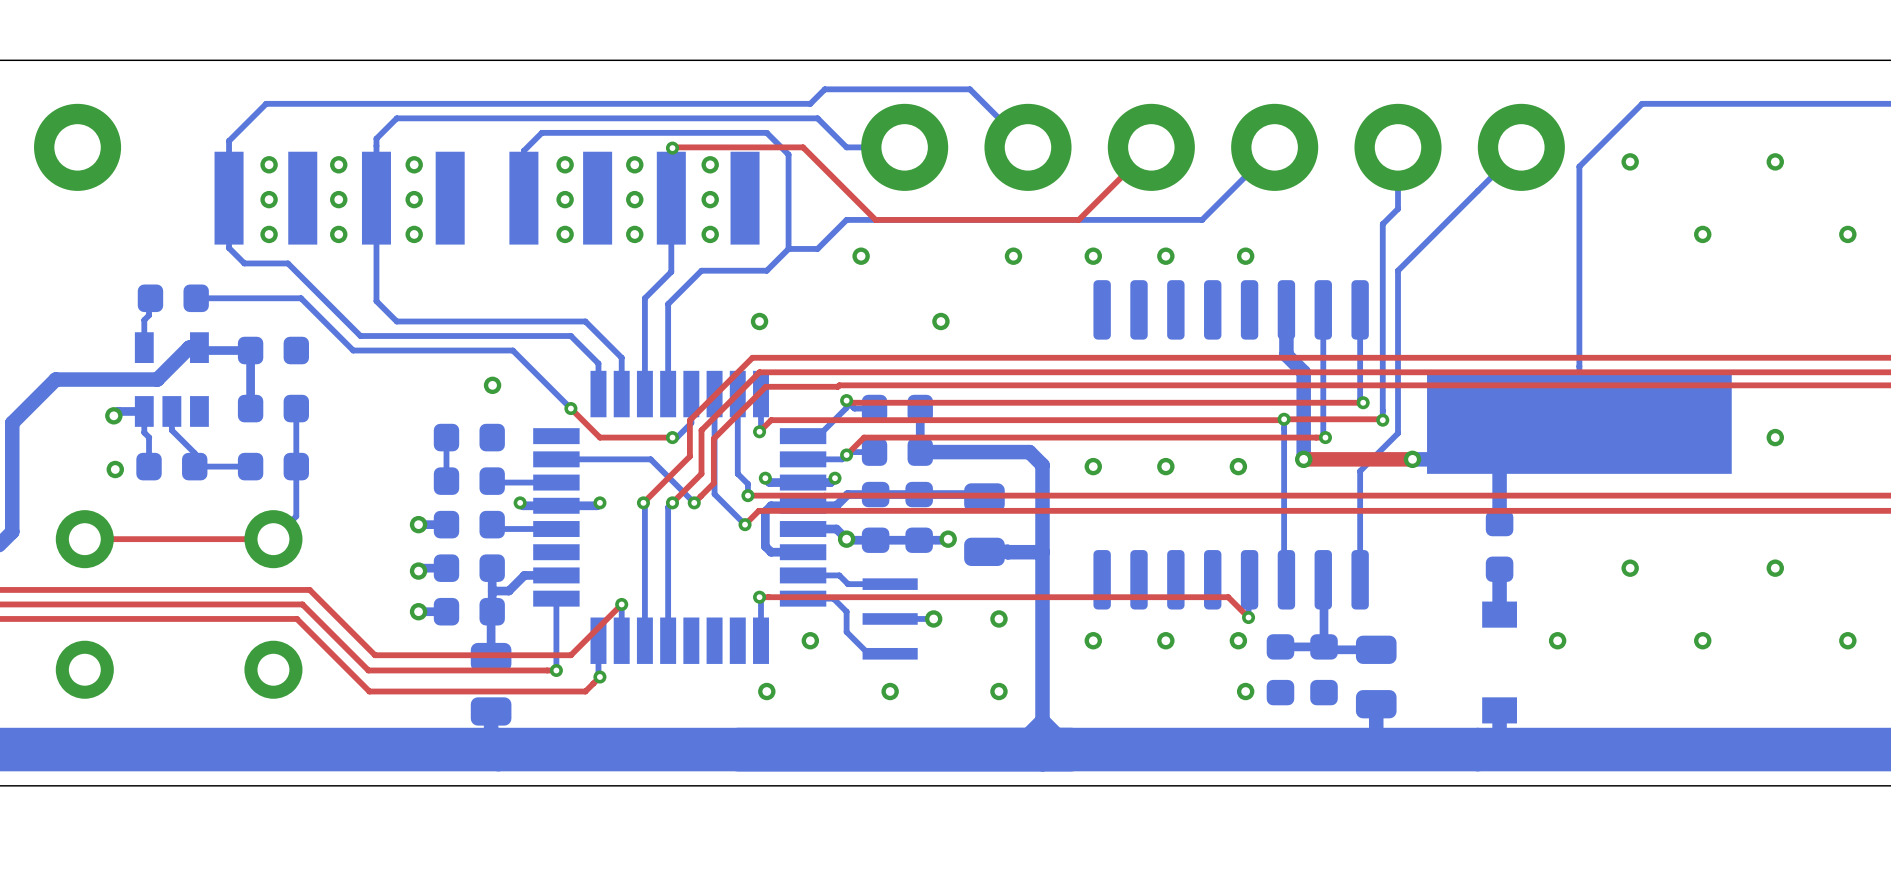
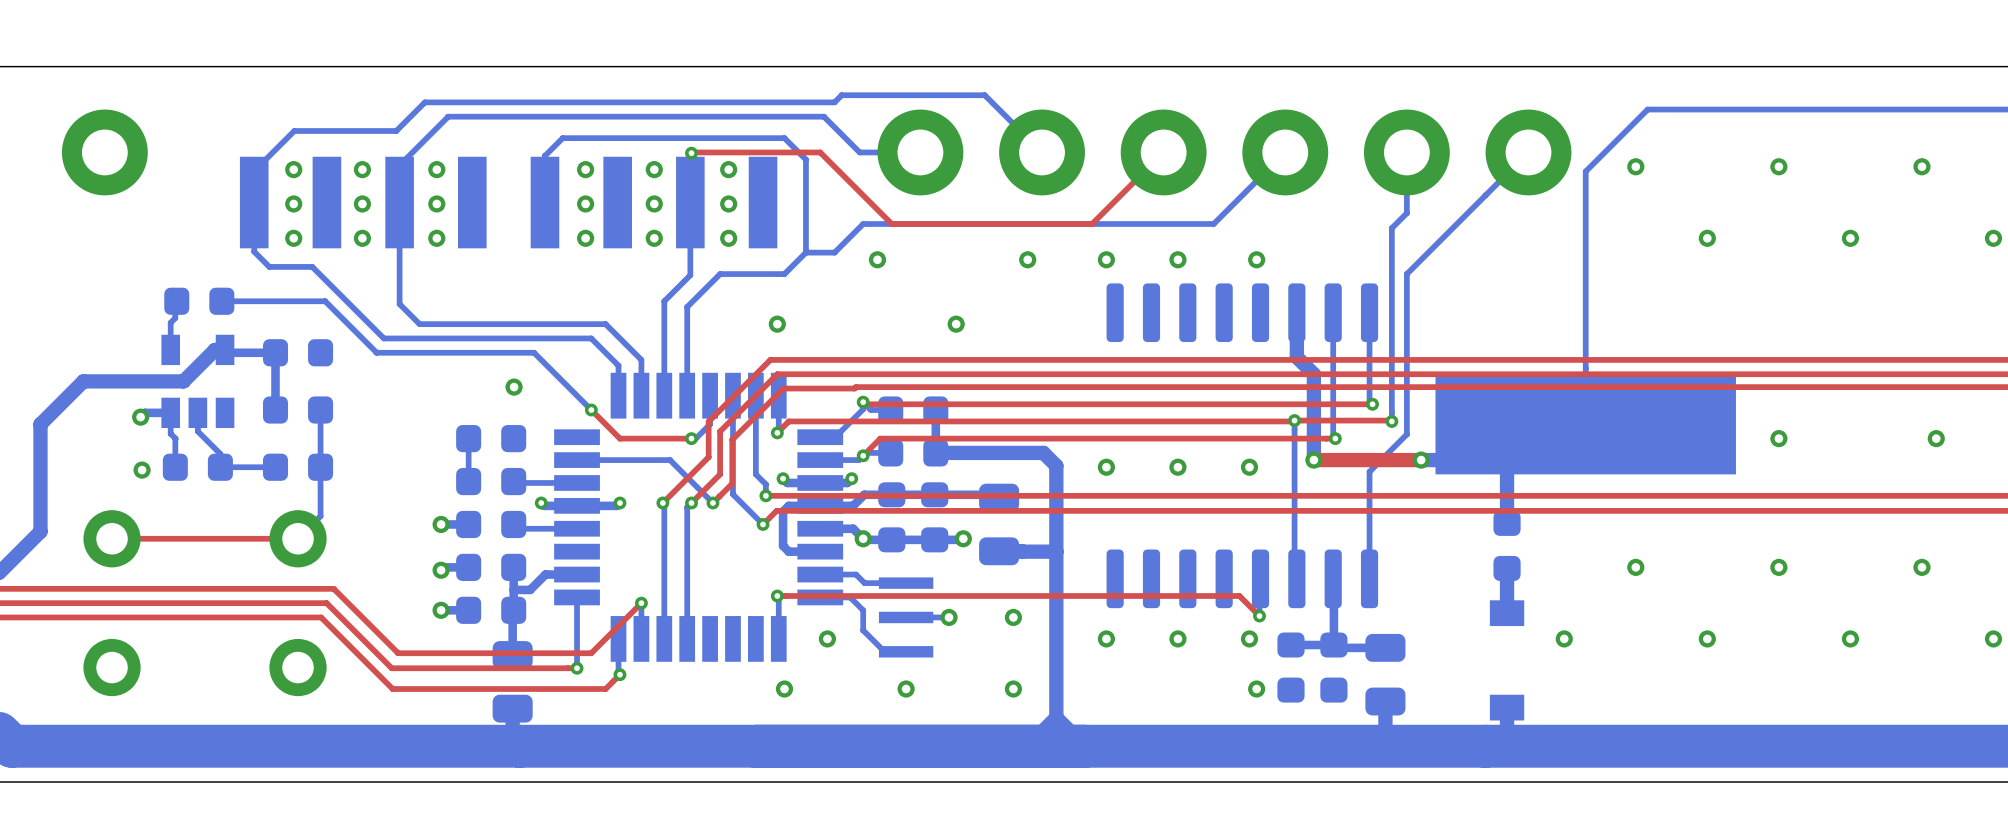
bottom track: (817, 96) (810, 103) (266, 103) (229, 140) (229, 166) -> (834, 102) (424, 102) (396, 131) (294, 131) (254, 171)
bottom track: (846, 147) (817, 118) (396, 118) (376, 138) (376, 160) -> (863, 152) (859, 152) (823, 116) (448, 116) (399, 165)

